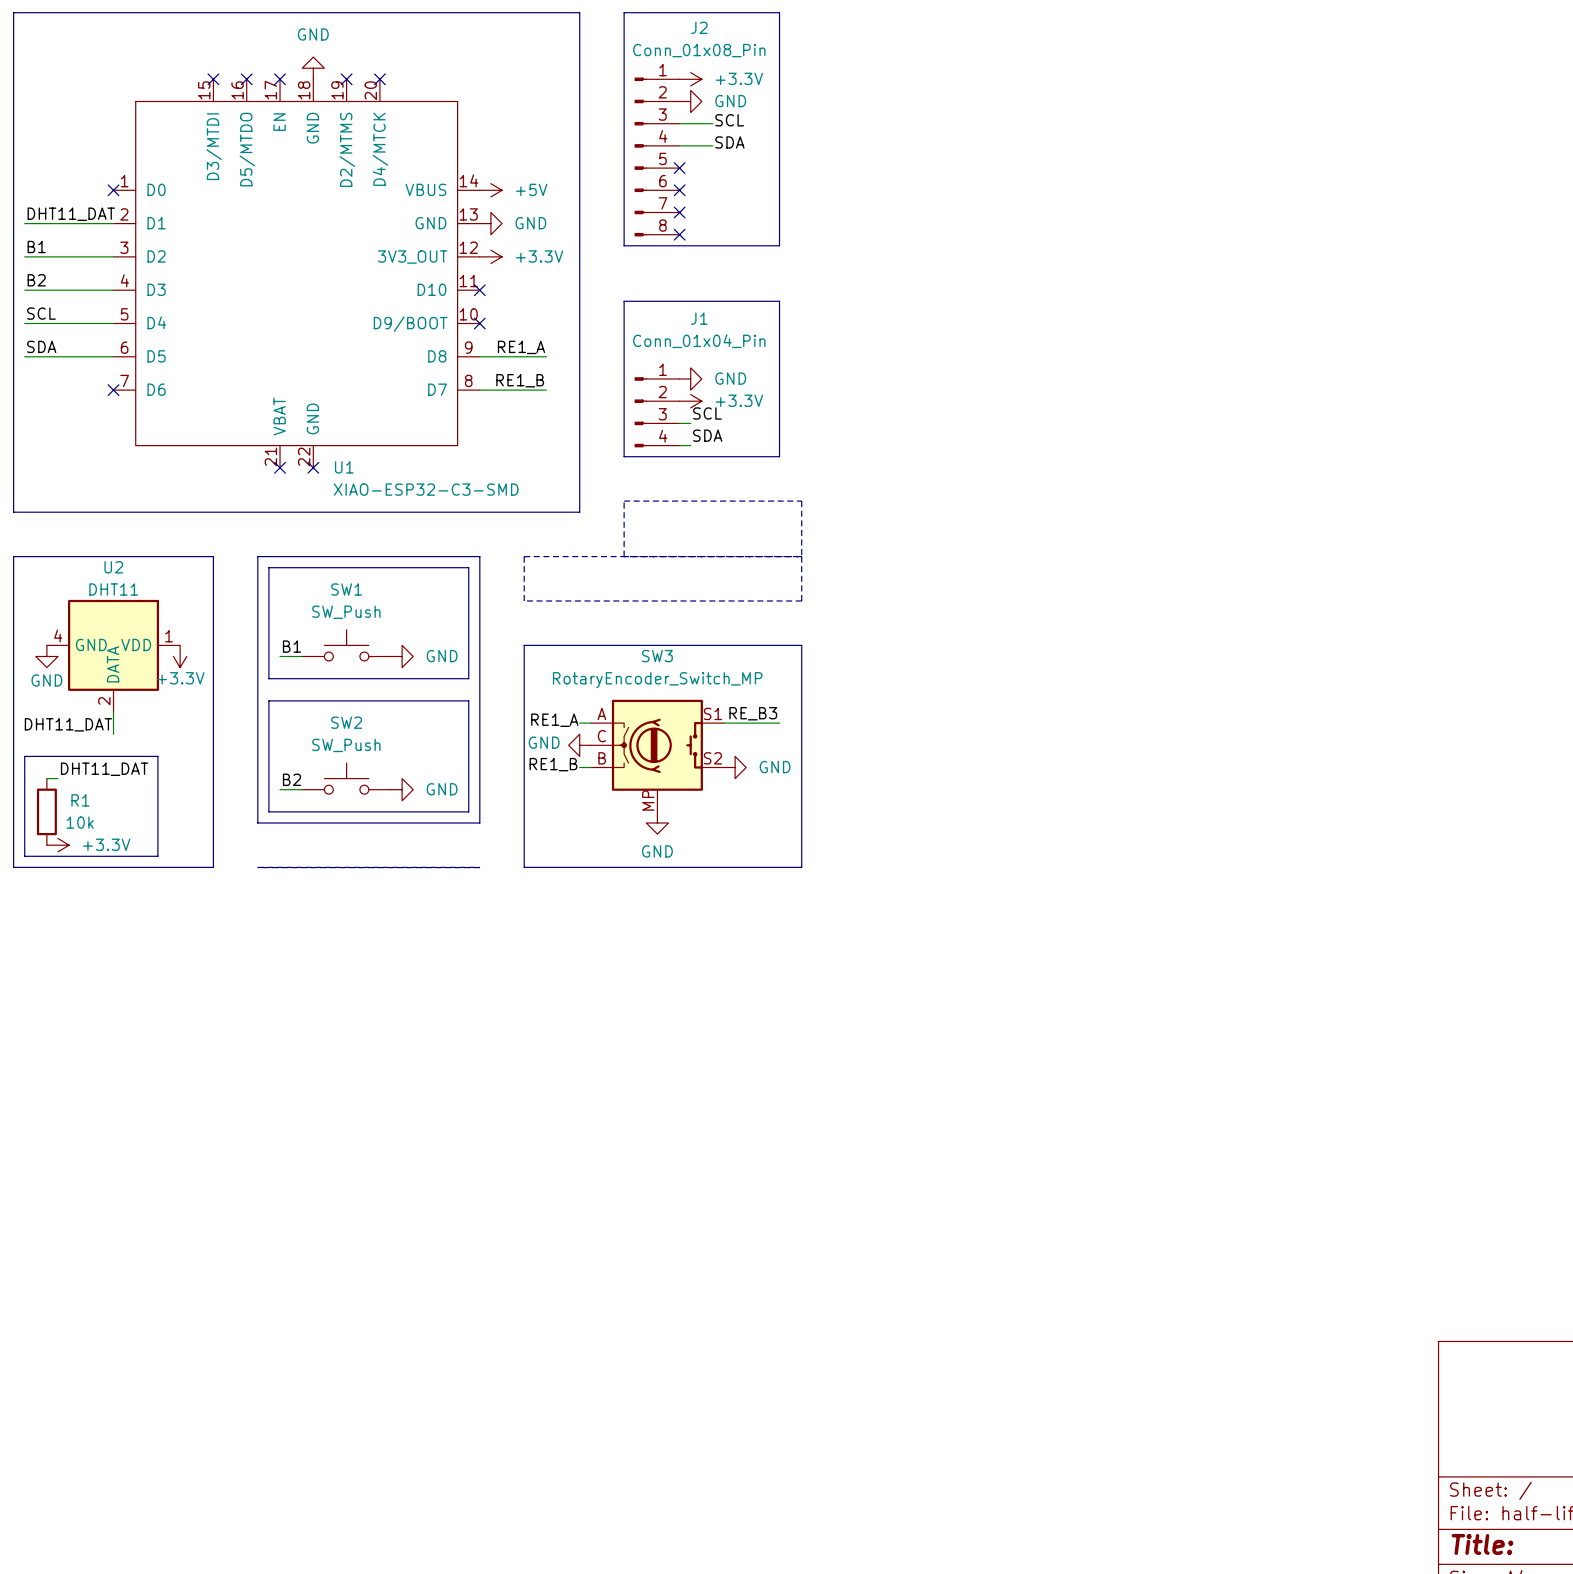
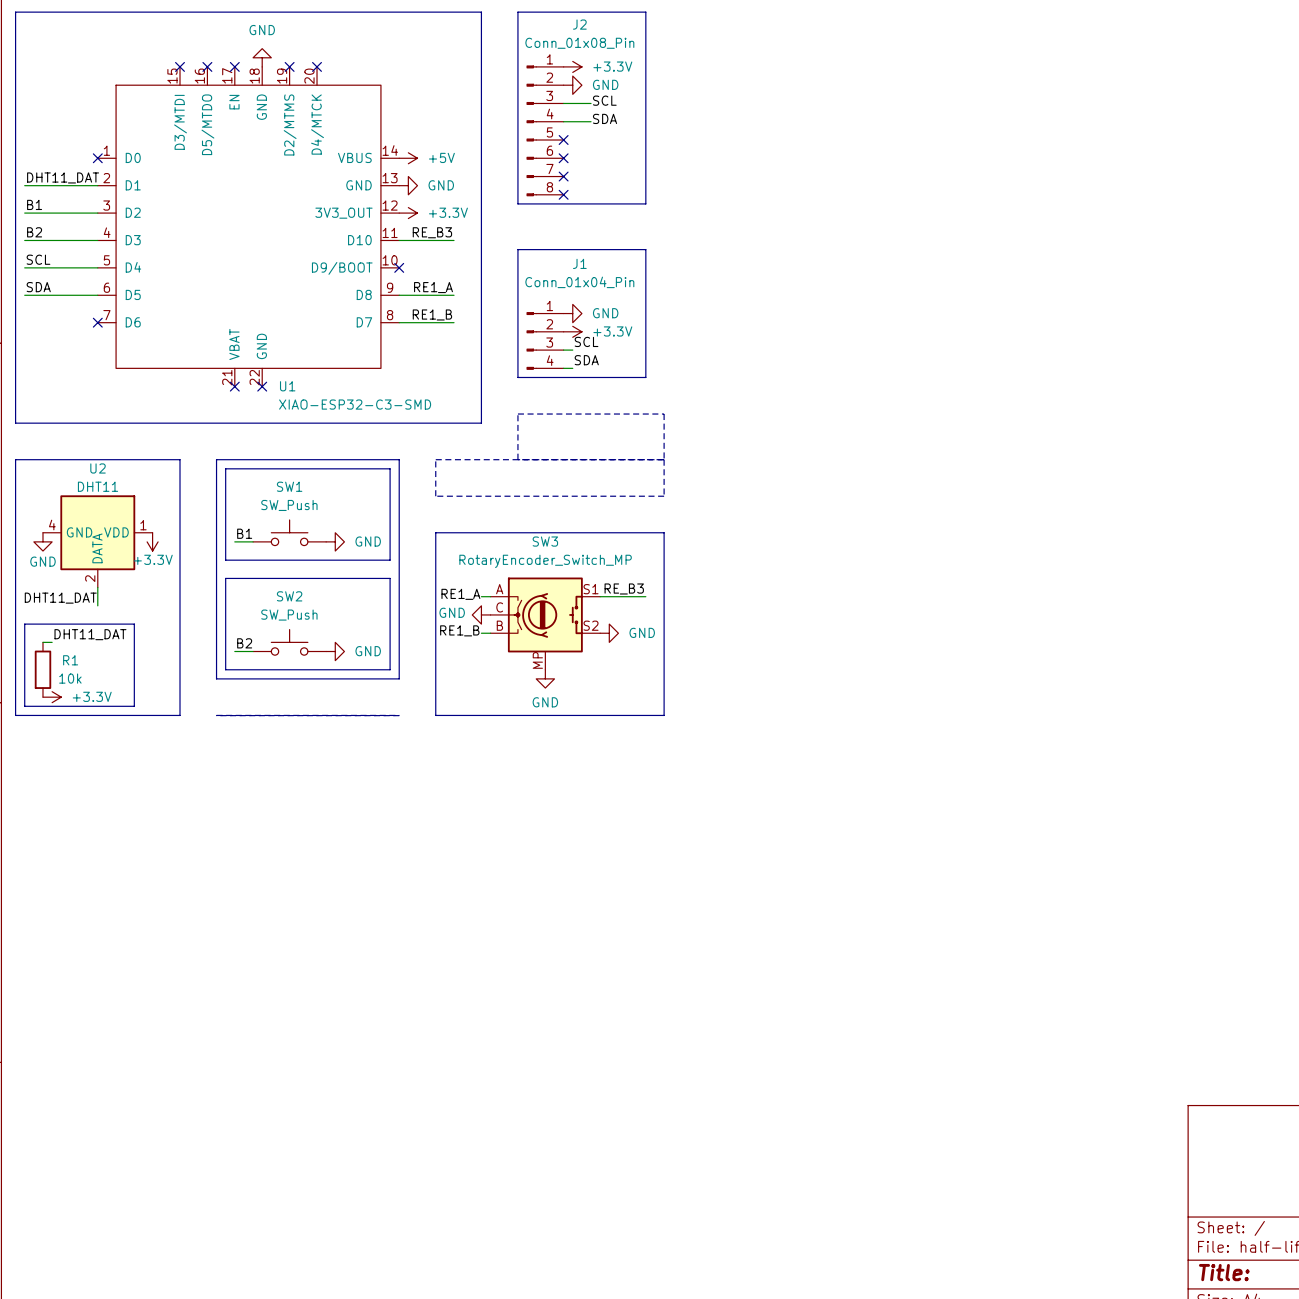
label: none -> RE_B3 (432, 232)
wire: none -> (399, 240) (454, 240)
no-connect mark: (479, 290) -> none

